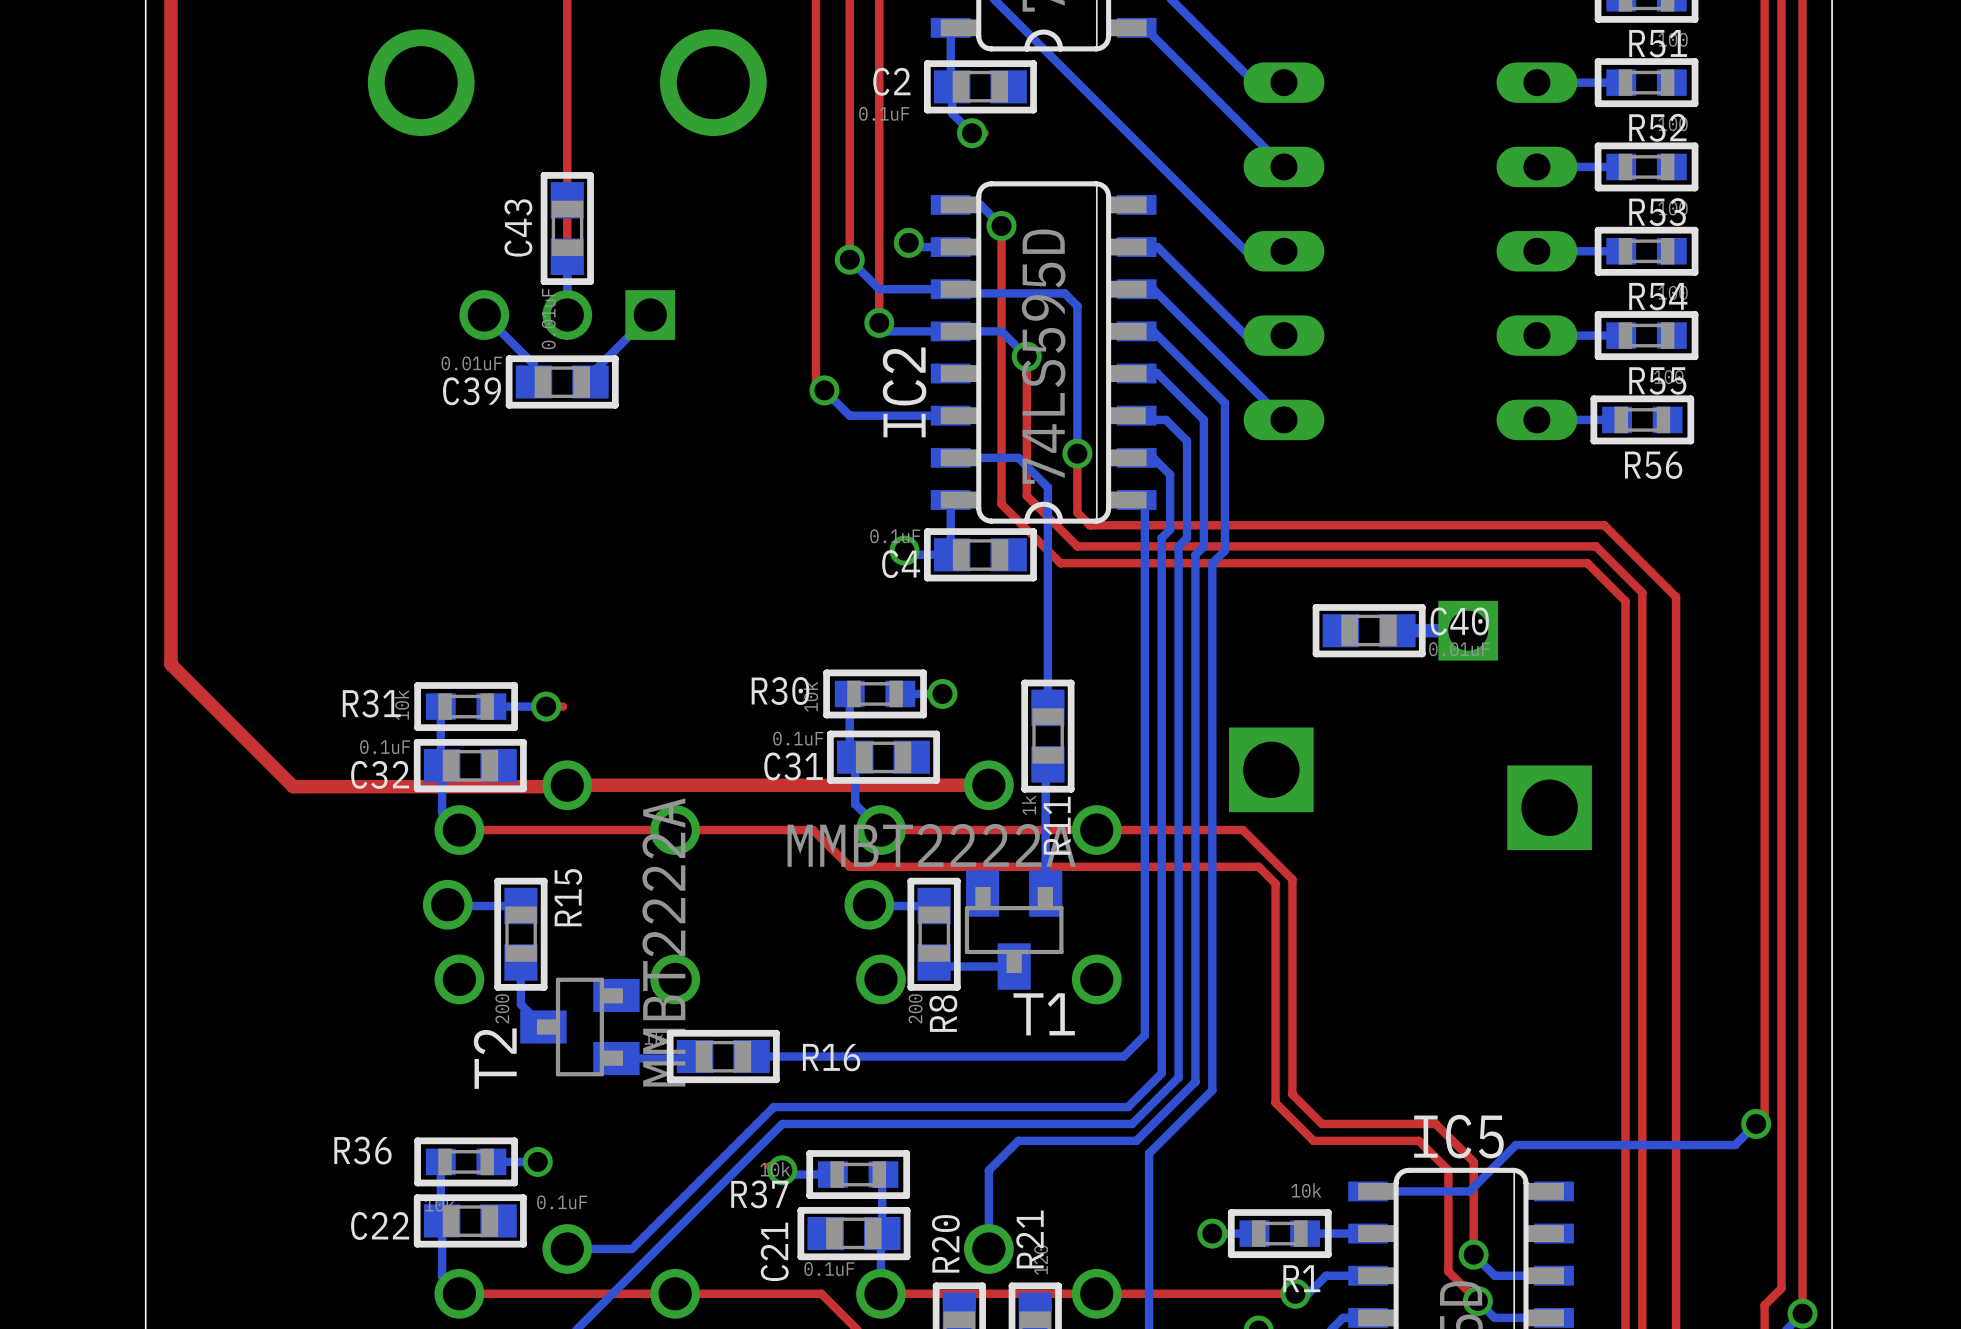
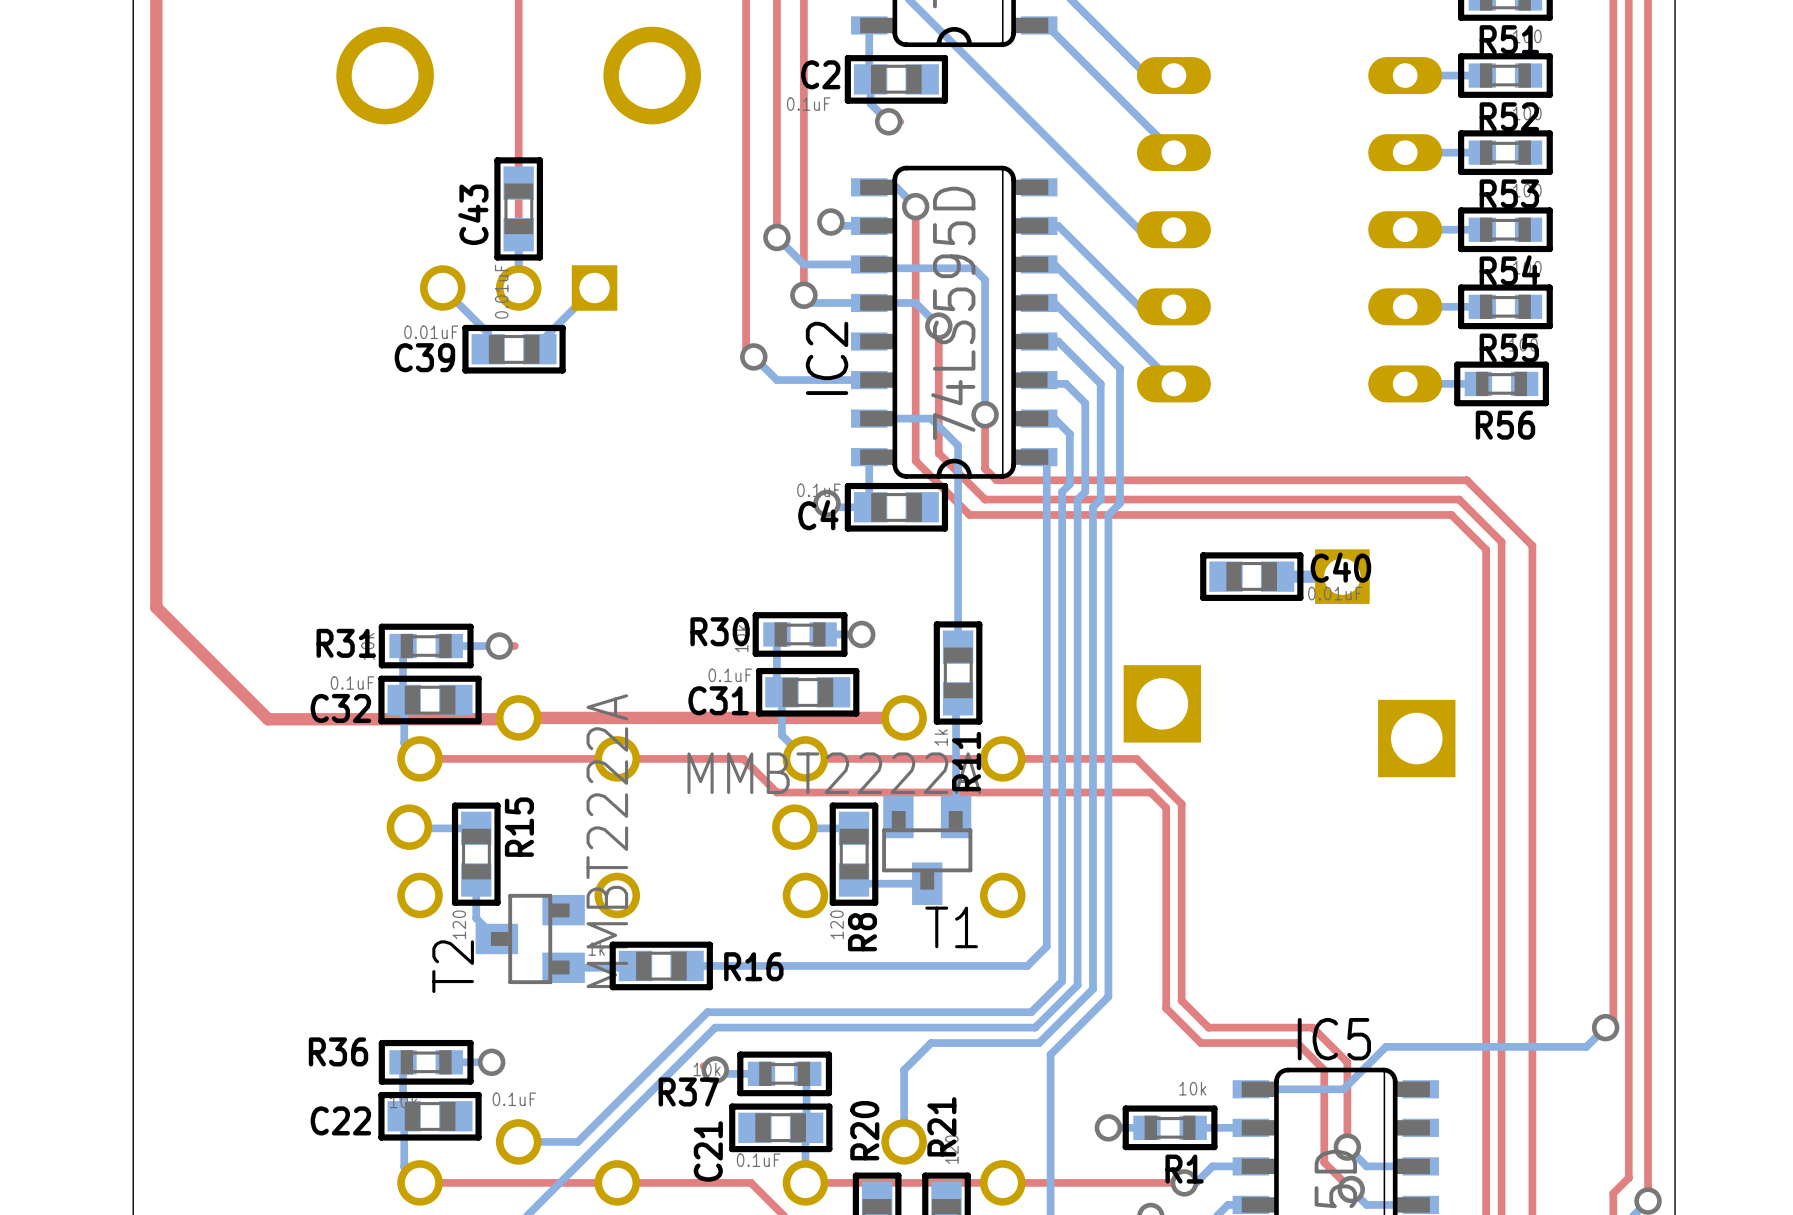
R15 value: 200 (502, 1008) -> 120 (459, 924)
R8 value: 200 (915, 1008) -> 120 (837, 924)

